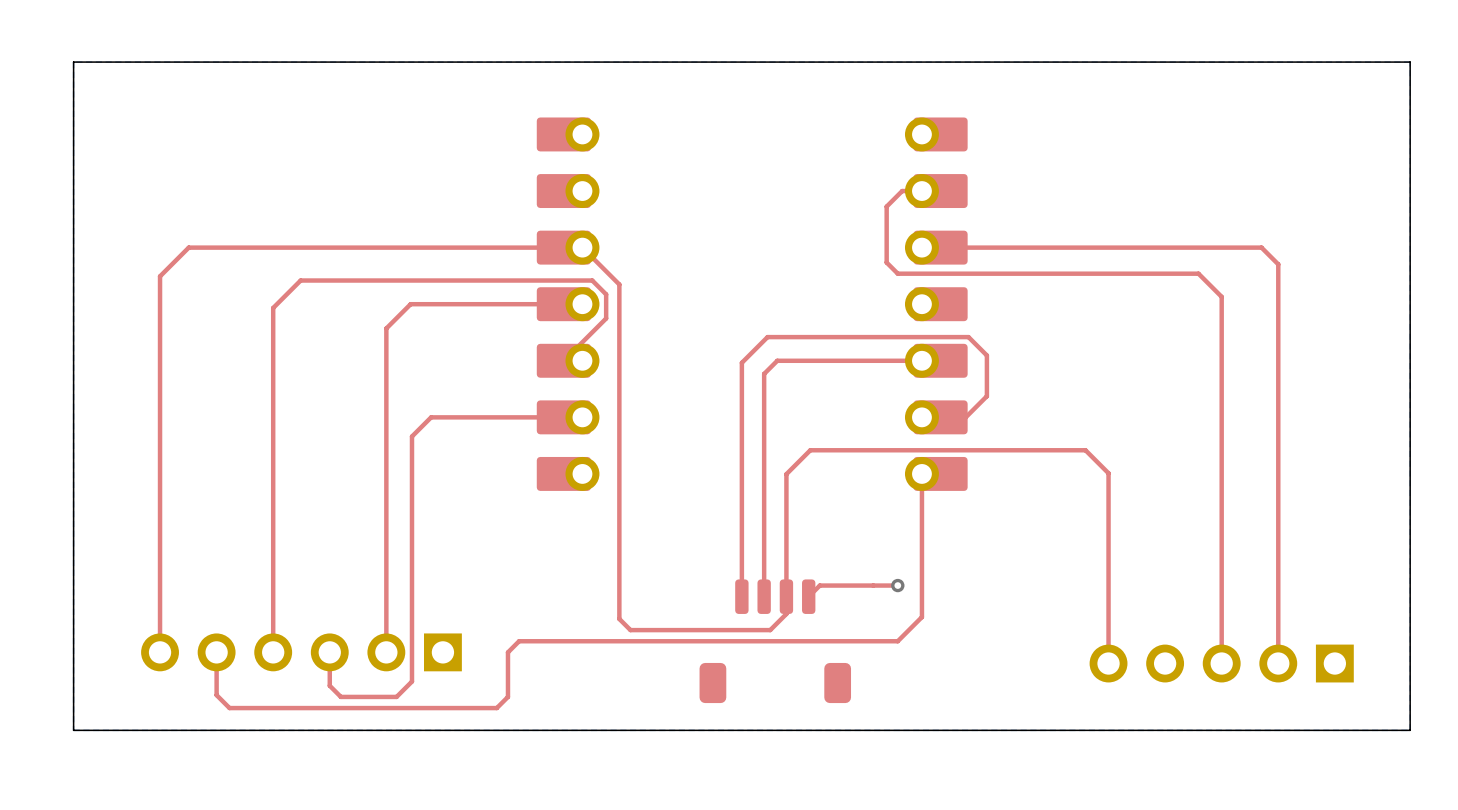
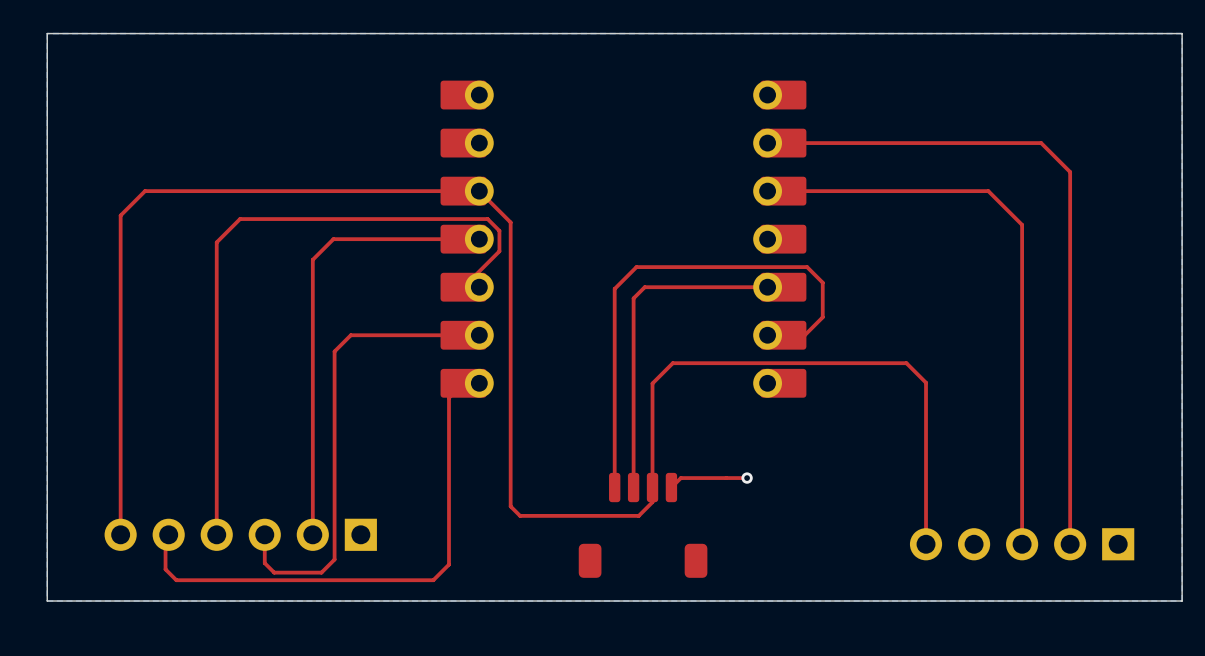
top track: (921, 191) (902, 191) (886, 206) (886, 262) (897, 273) (1198, 273) (1221, 296) -> (767, 143) (1041, 143) (1070, 172) (1070, 205)
top track: (1181, 247) (1261, 247) (1278, 264) -> (988, 191) (1022, 224) (1022, 232)
top track: (921, 473) (921, 617) (897, 641) (519, 641) (507, 652) (507, 696) (496, 708) (229, 708) (216, 695) (216, 652) -> (463, 383) (449, 397) (449, 564) (433, 580) (176, 580) (165, 569) (165, 535) (168, 534)

